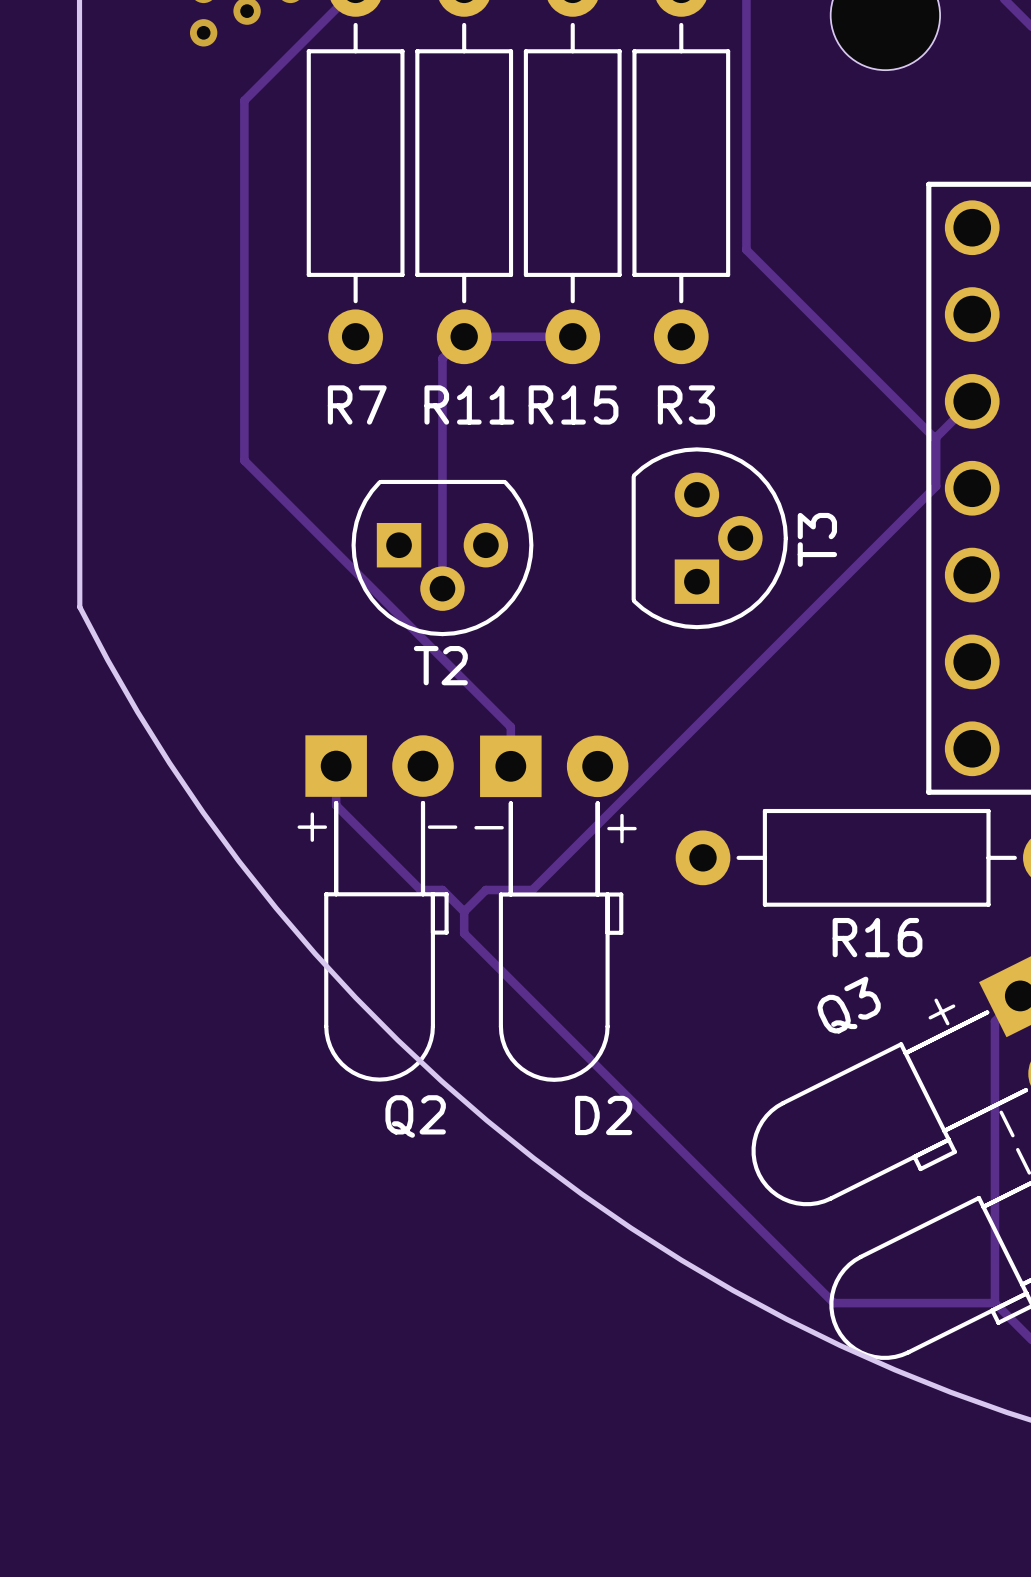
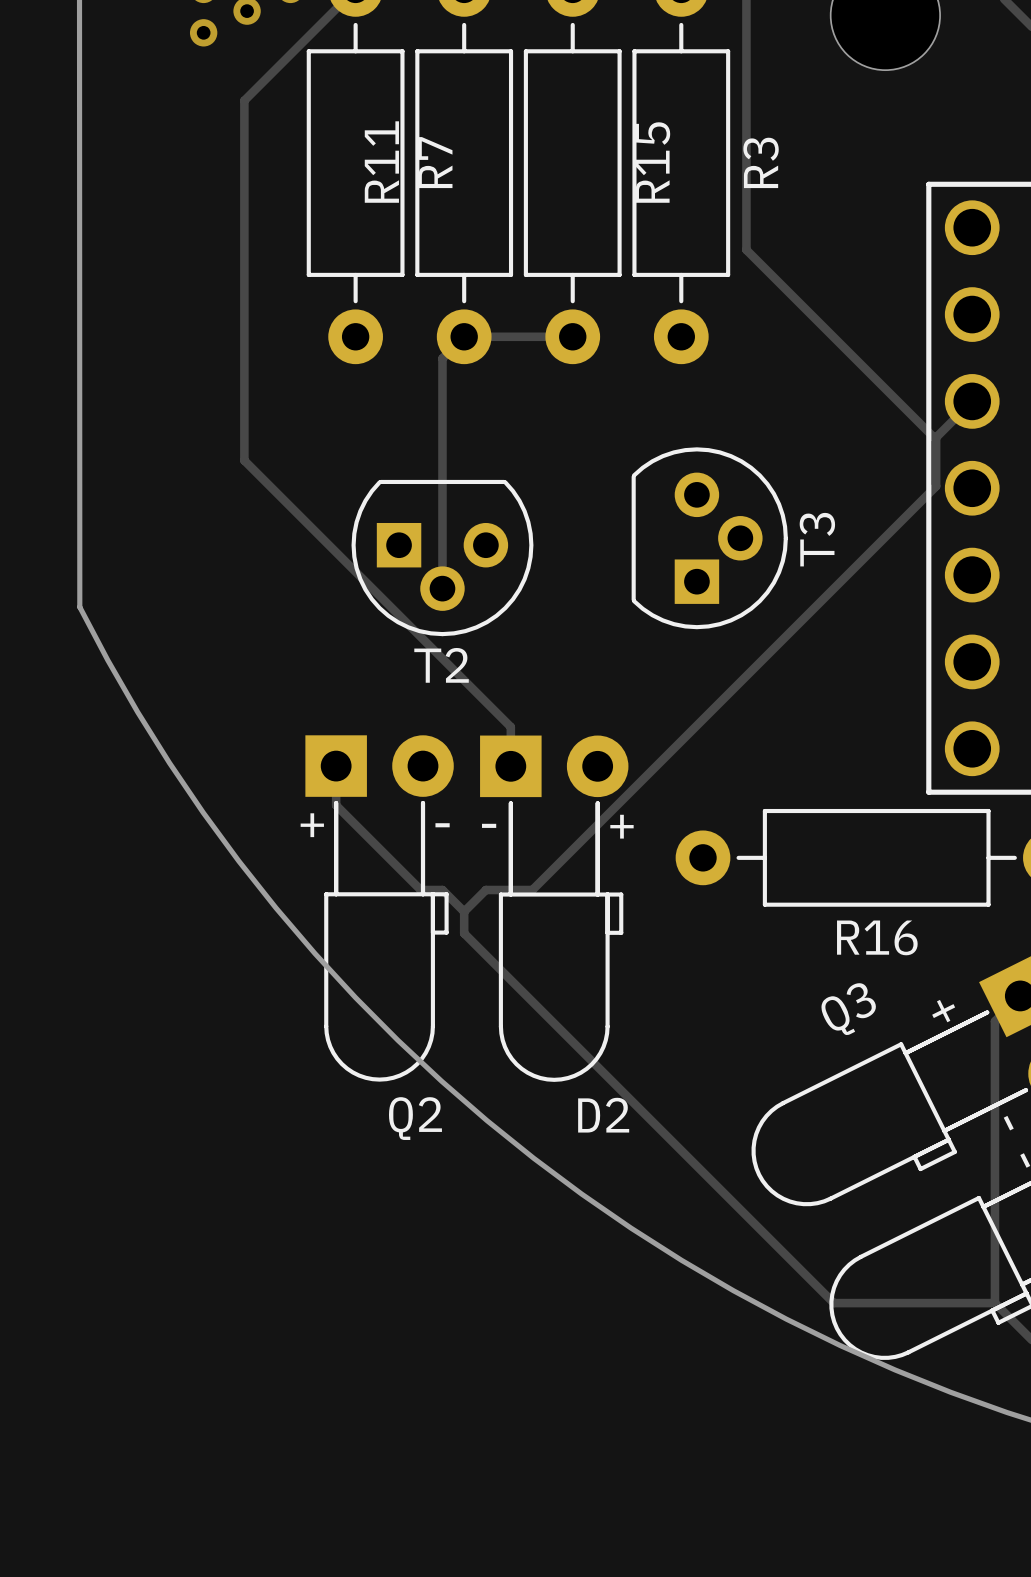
R7 name rotation: 0° (357, 404) -> 90° counterclockwise (435, 162)
R7 name position: R7 (357, 404) -> R7 (435, 162)
R11 name rotation: 0° (469, 404) -> 90° counterclockwise (381, 162)
R11 name position: R11 (469, 404) -> R11 (381, 162)
R15 name rotation: 0° (573, 404) -> 90° counterclockwise (652, 162)
R15 name position: R15 (573, 404) -> R15 (652, 162)
R3 name rotation: 0° (686, 404) -> 90° counterclockwise (761, 162)
R3 name position: R3 (686, 404) -> R3 (761, 162)

